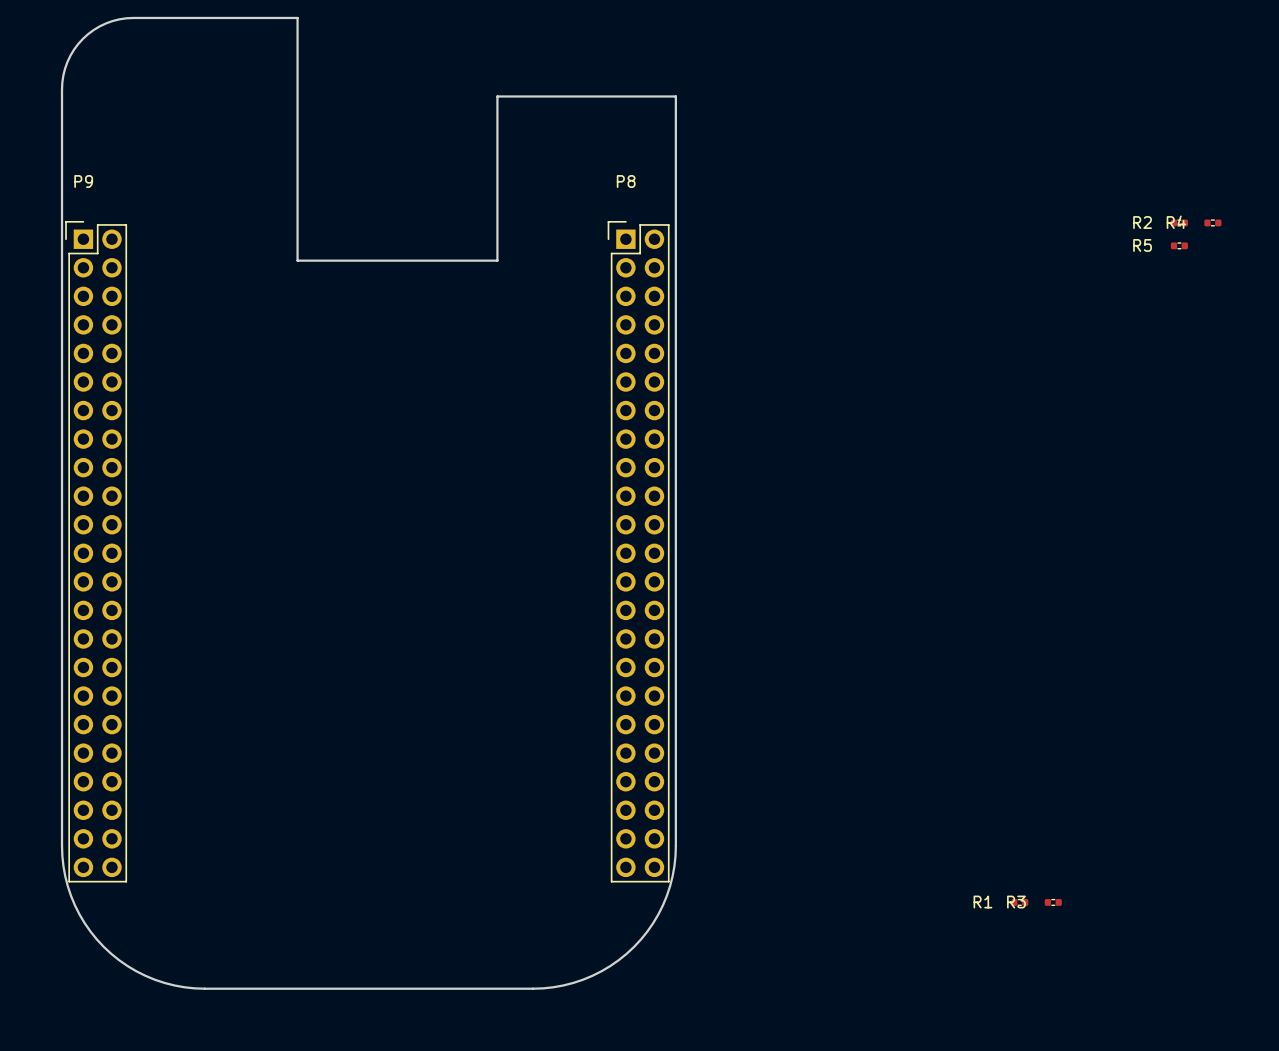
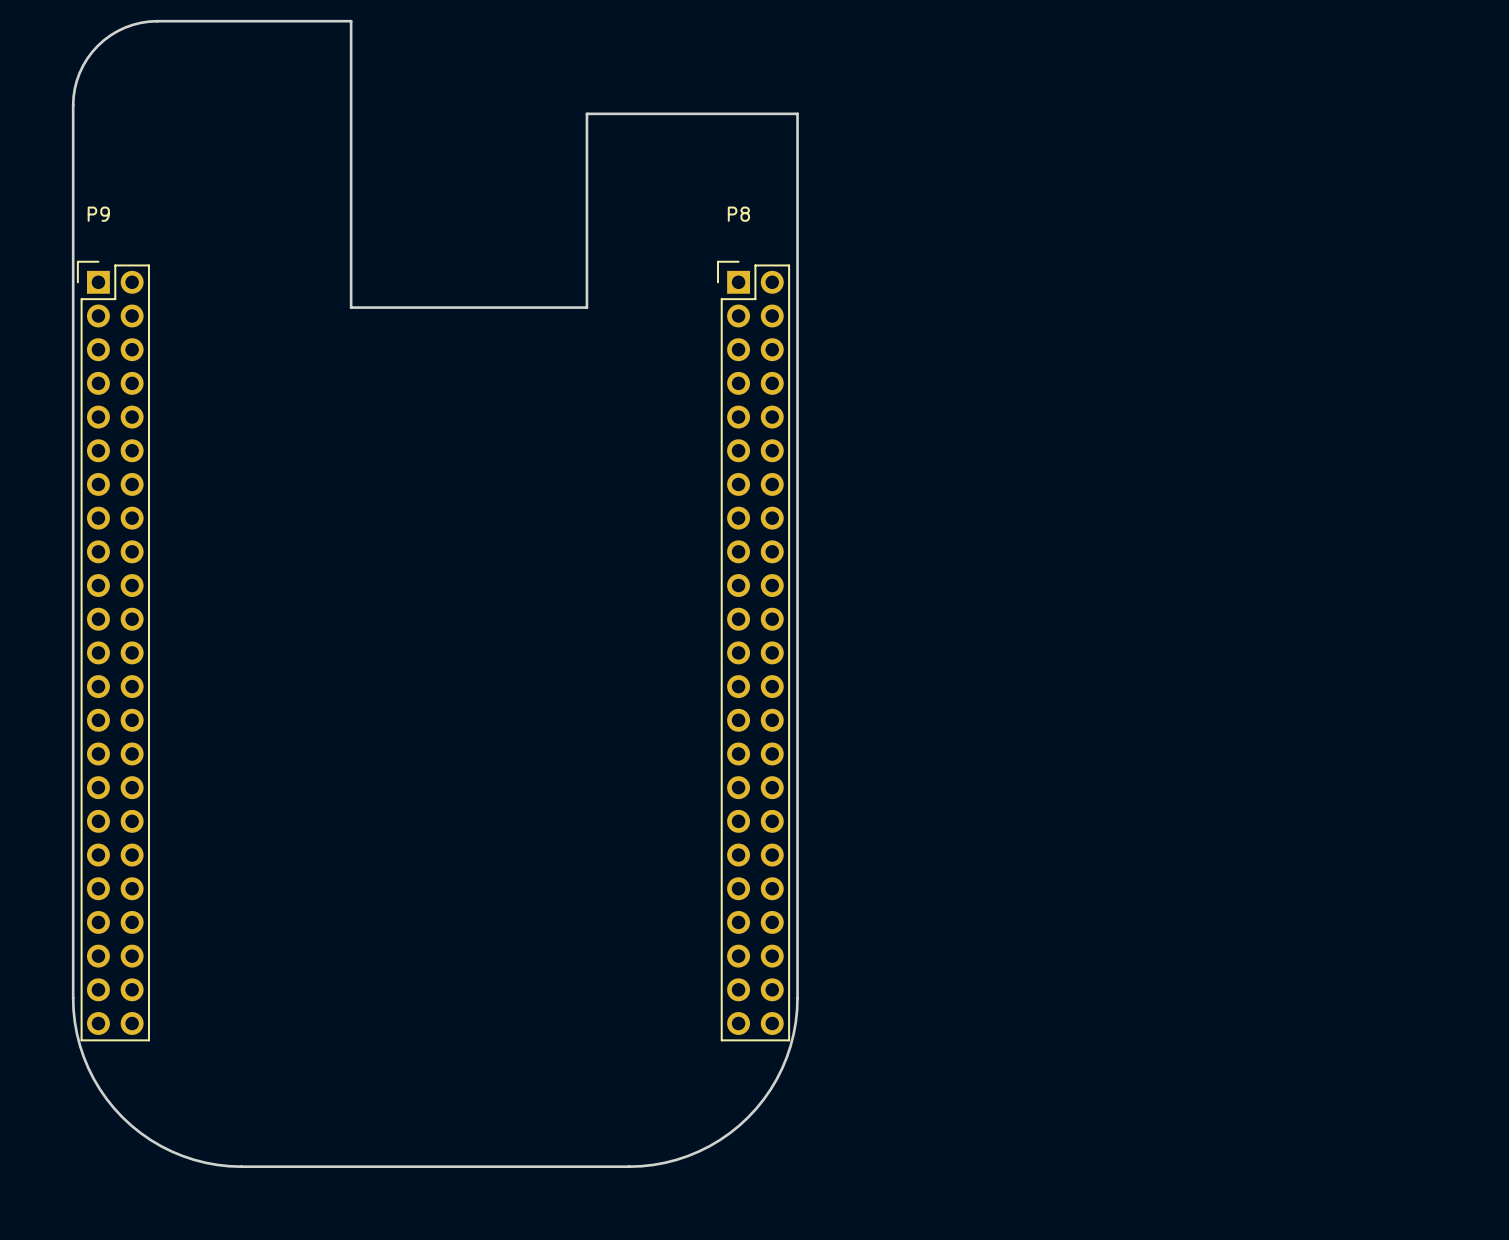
R2: (1179, 222) -> none
R4: (1212, 222) -> none
R5: (1179, 245) -> none
R1: (1019, 902) -> none
R3: (1053, 902) -> none

